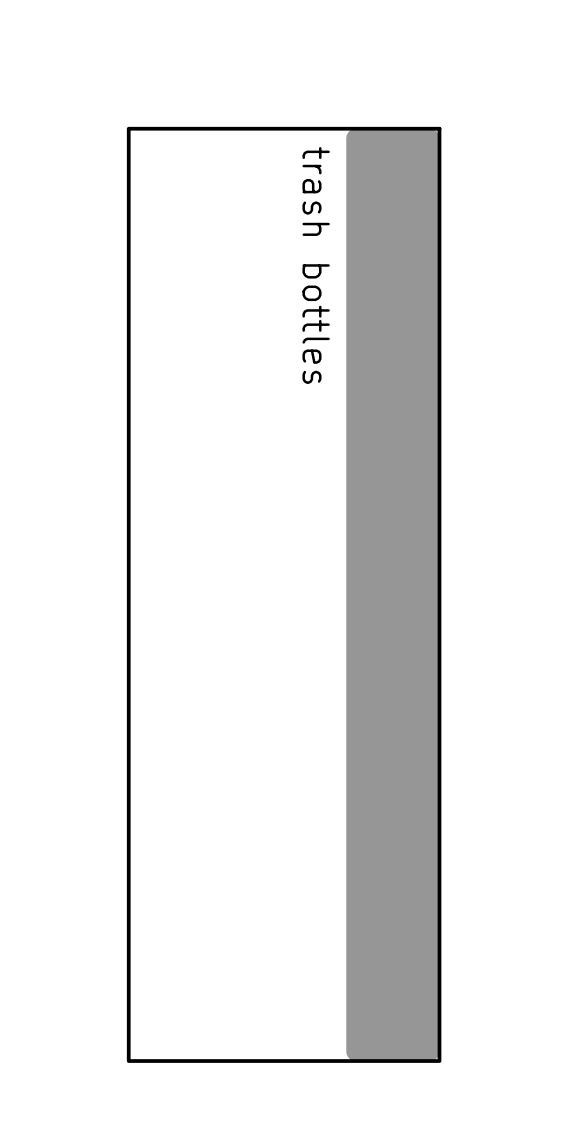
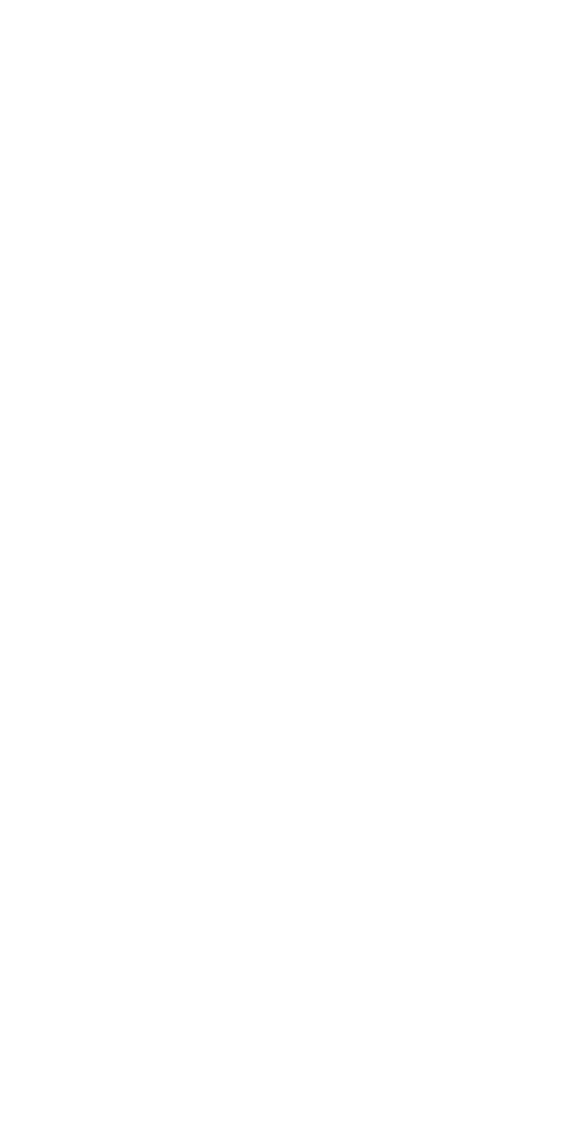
part: trash bottles (284, 594) -> none

